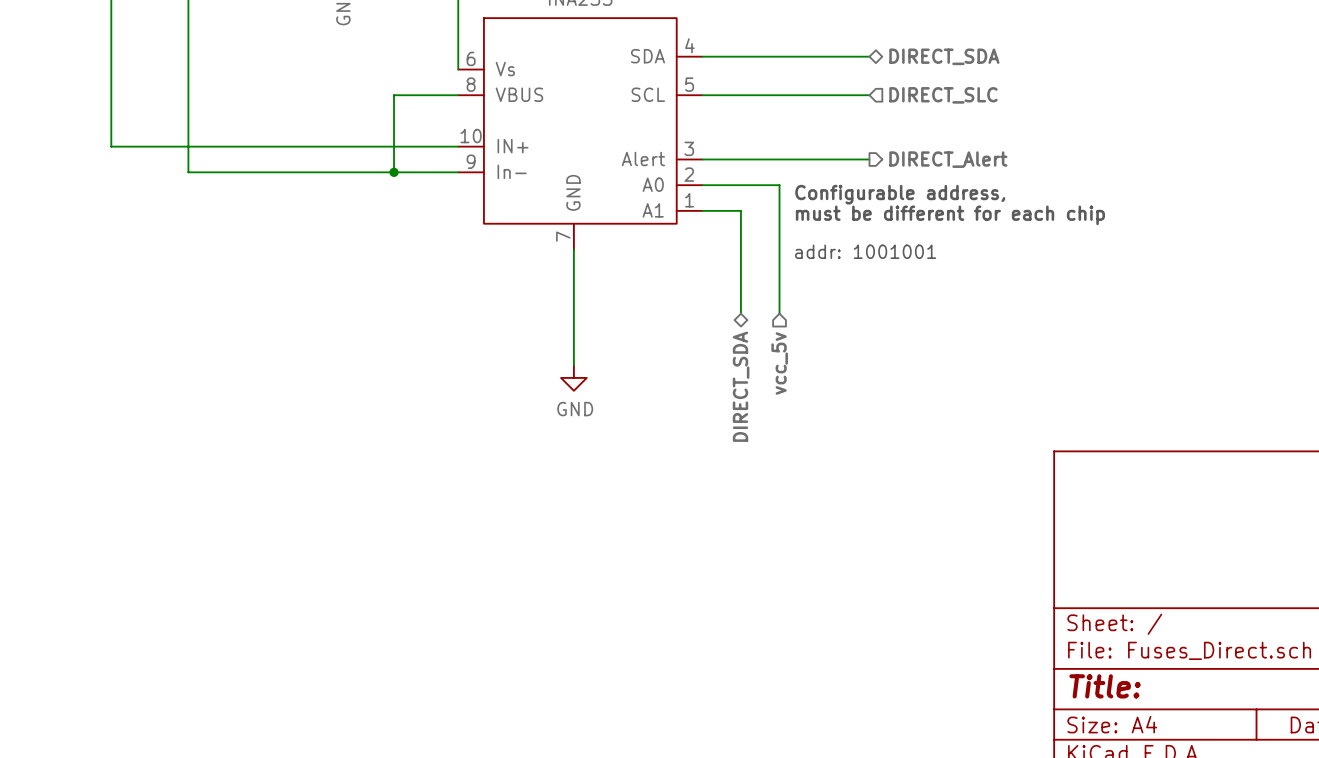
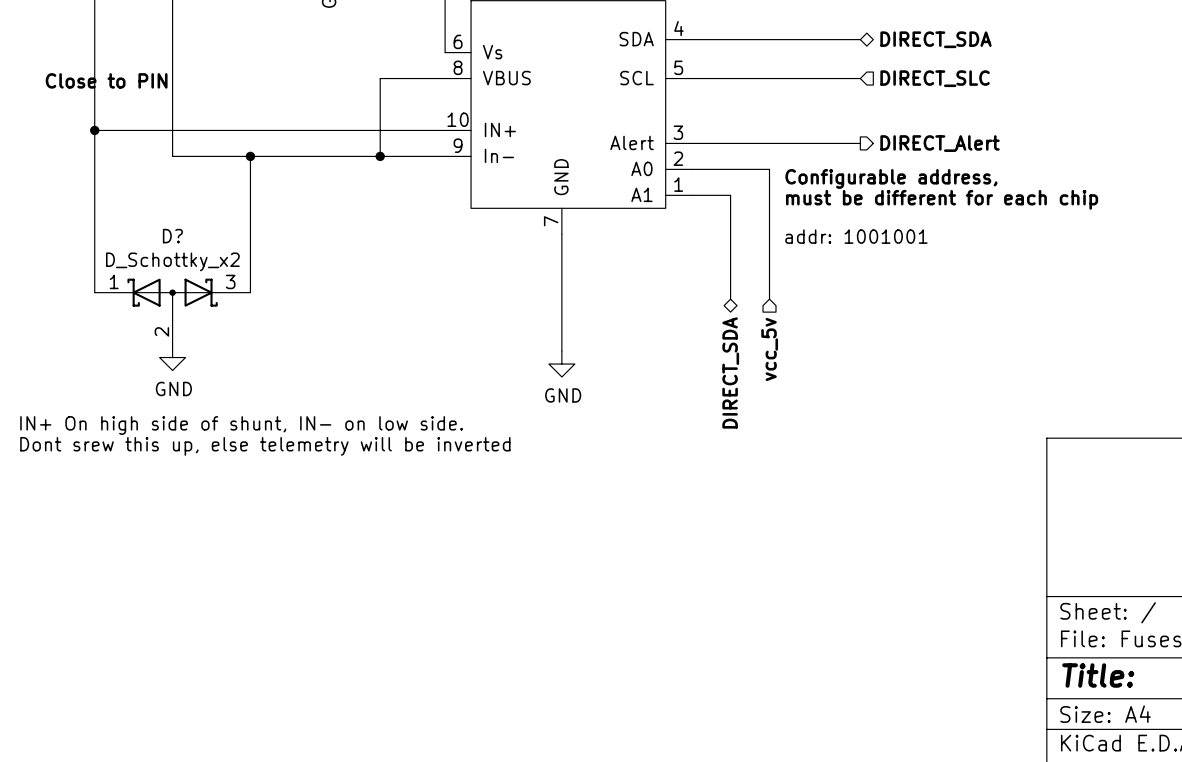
text: none -> Close to PIN (106, 80)
wire: none -> (94, 130) (94, 292)
junction: none -> (94, 130)
wire: none -> (250, 156) (250, 292)
junction: none -> (250, 156)
D?: none -> D_Schottky_x2 (172, 311)
power symbol: none -> GND (172, 357)
text: none -> IN+ On high side of shunt, IN- on low side. (241, 425)
text: none -> Dont srew this up, else telemetry will be inverted (265, 446)

